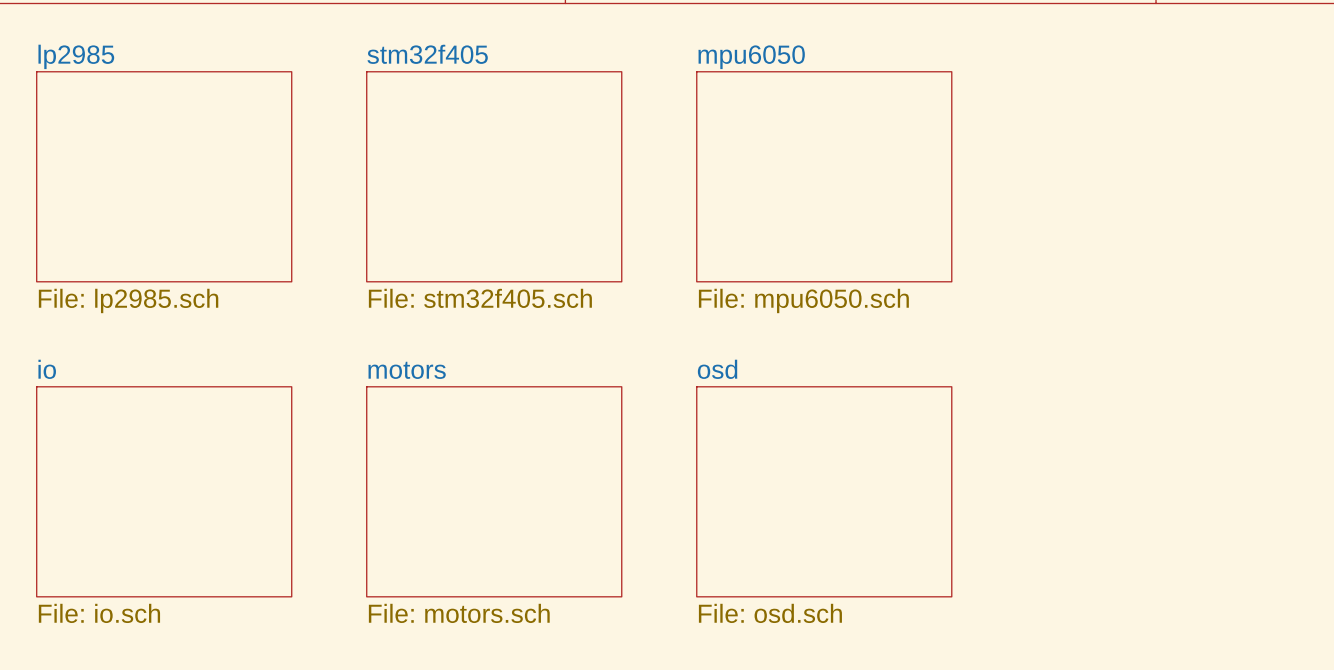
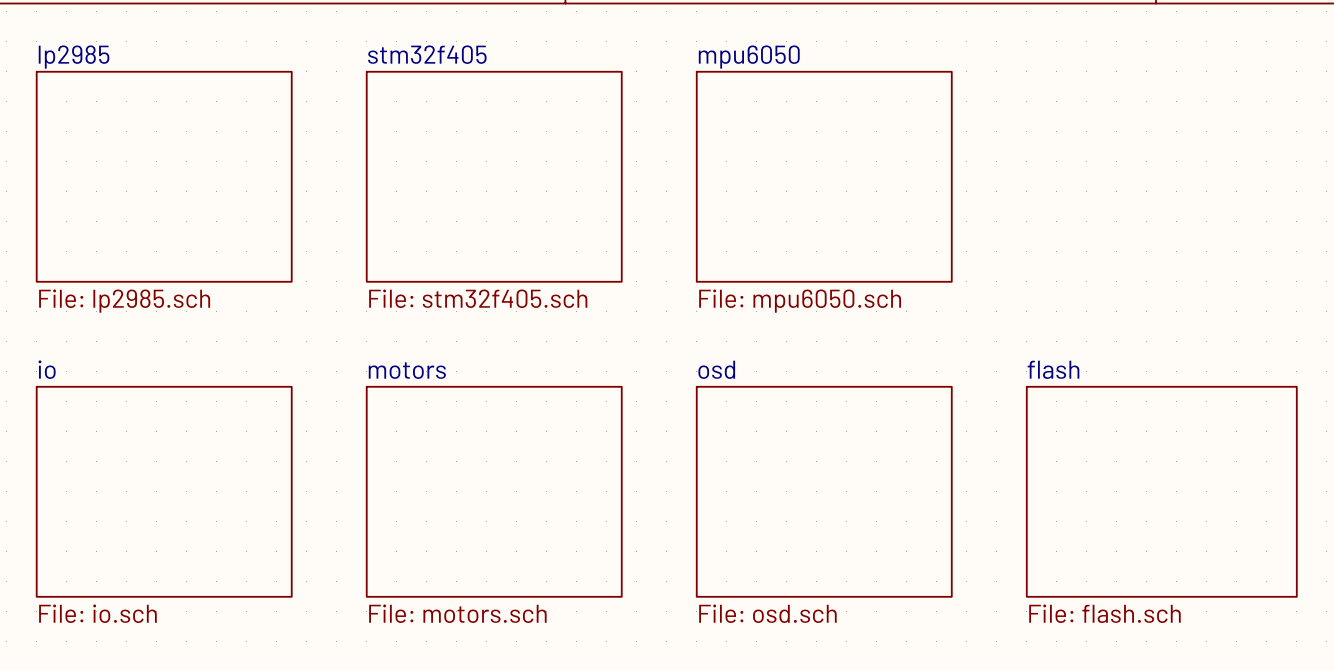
sheet flash: none -> File: flash.sch (1161, 491)

